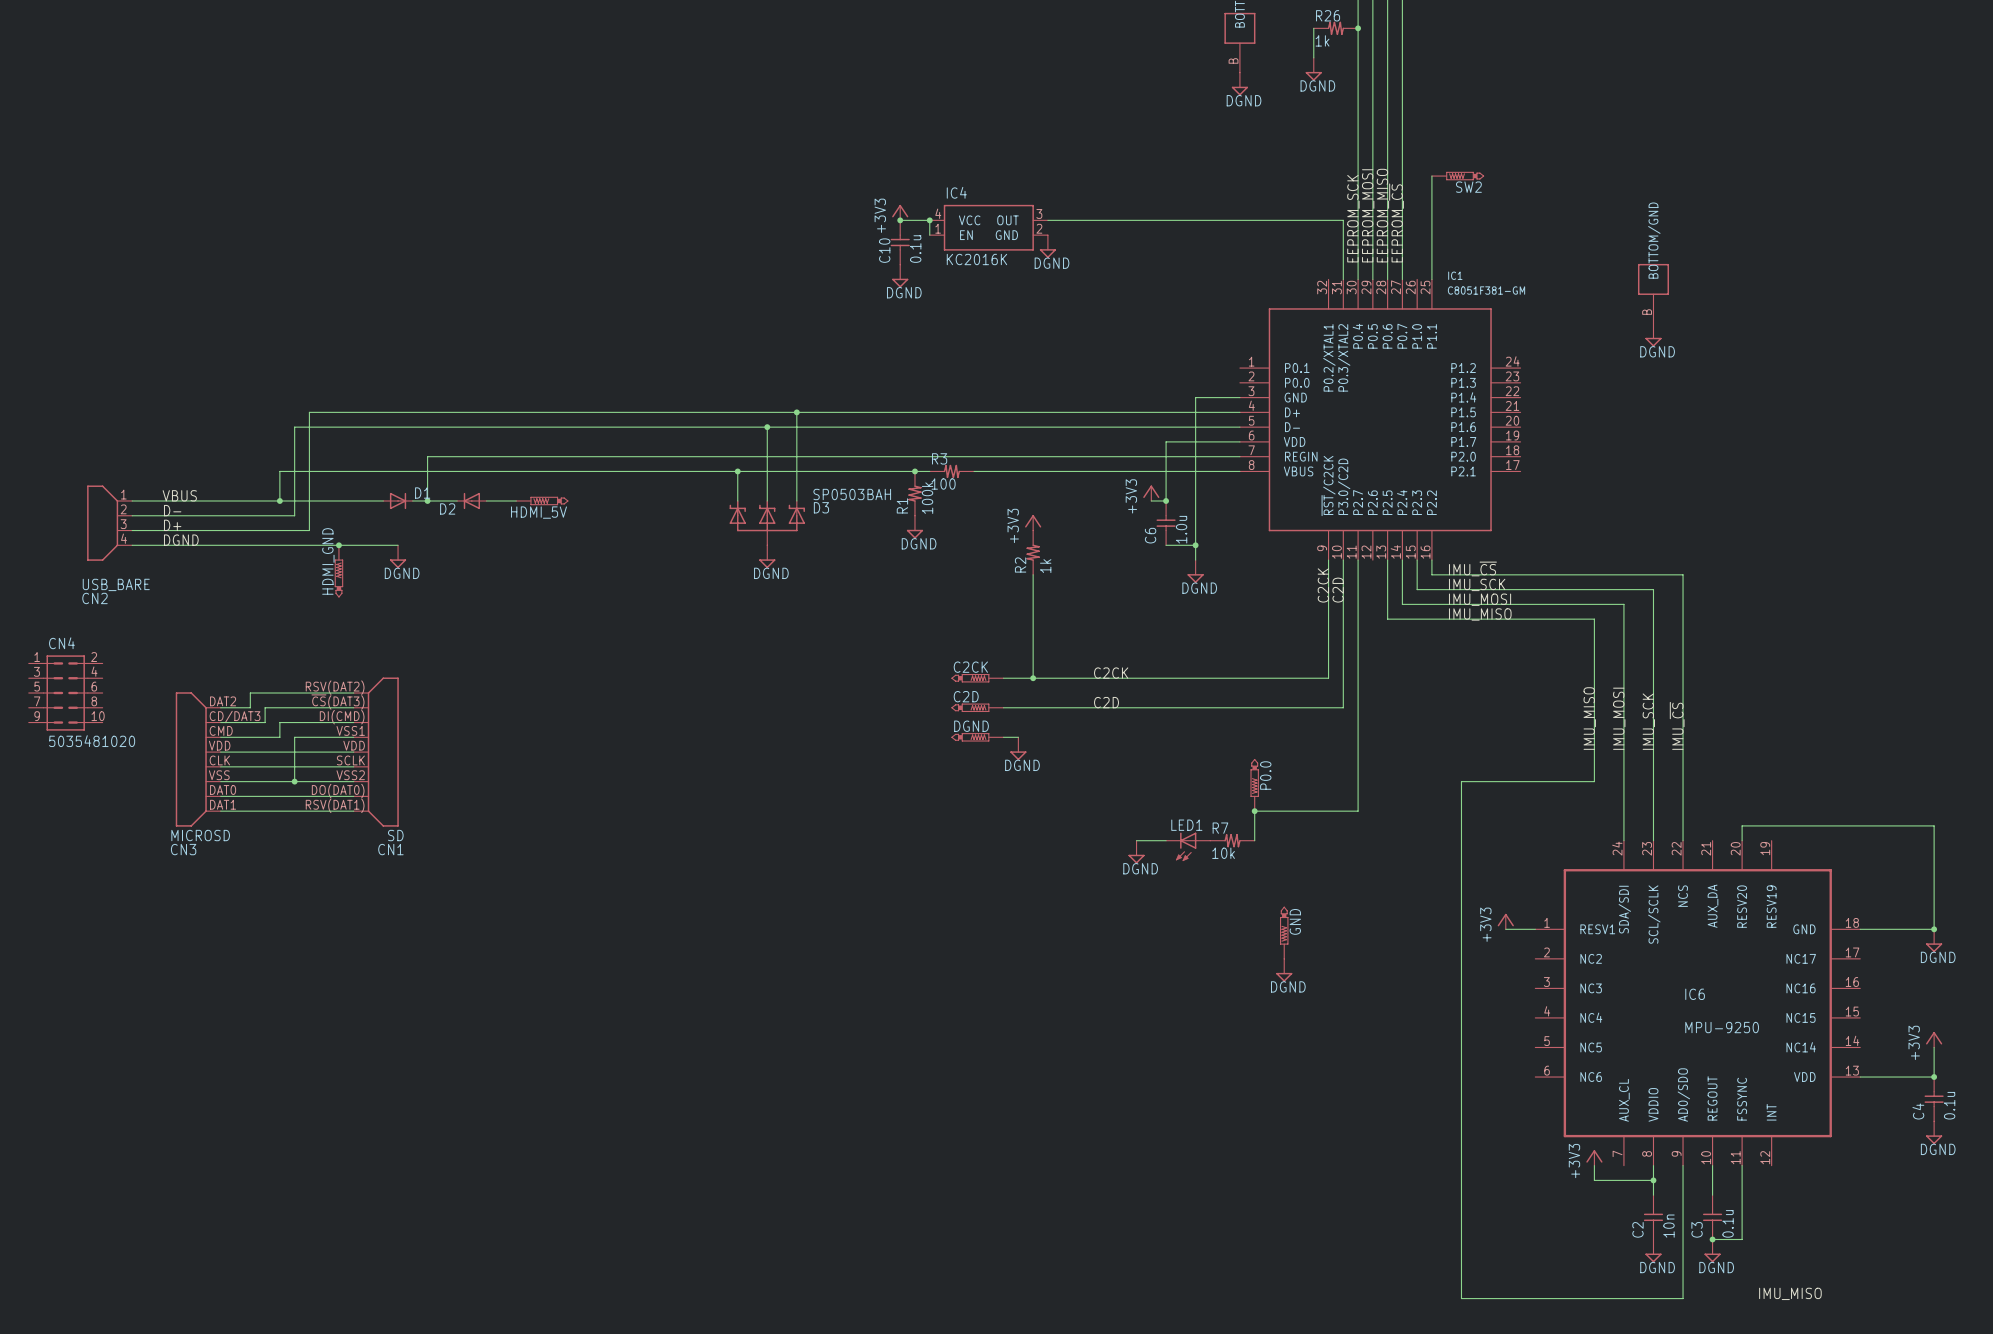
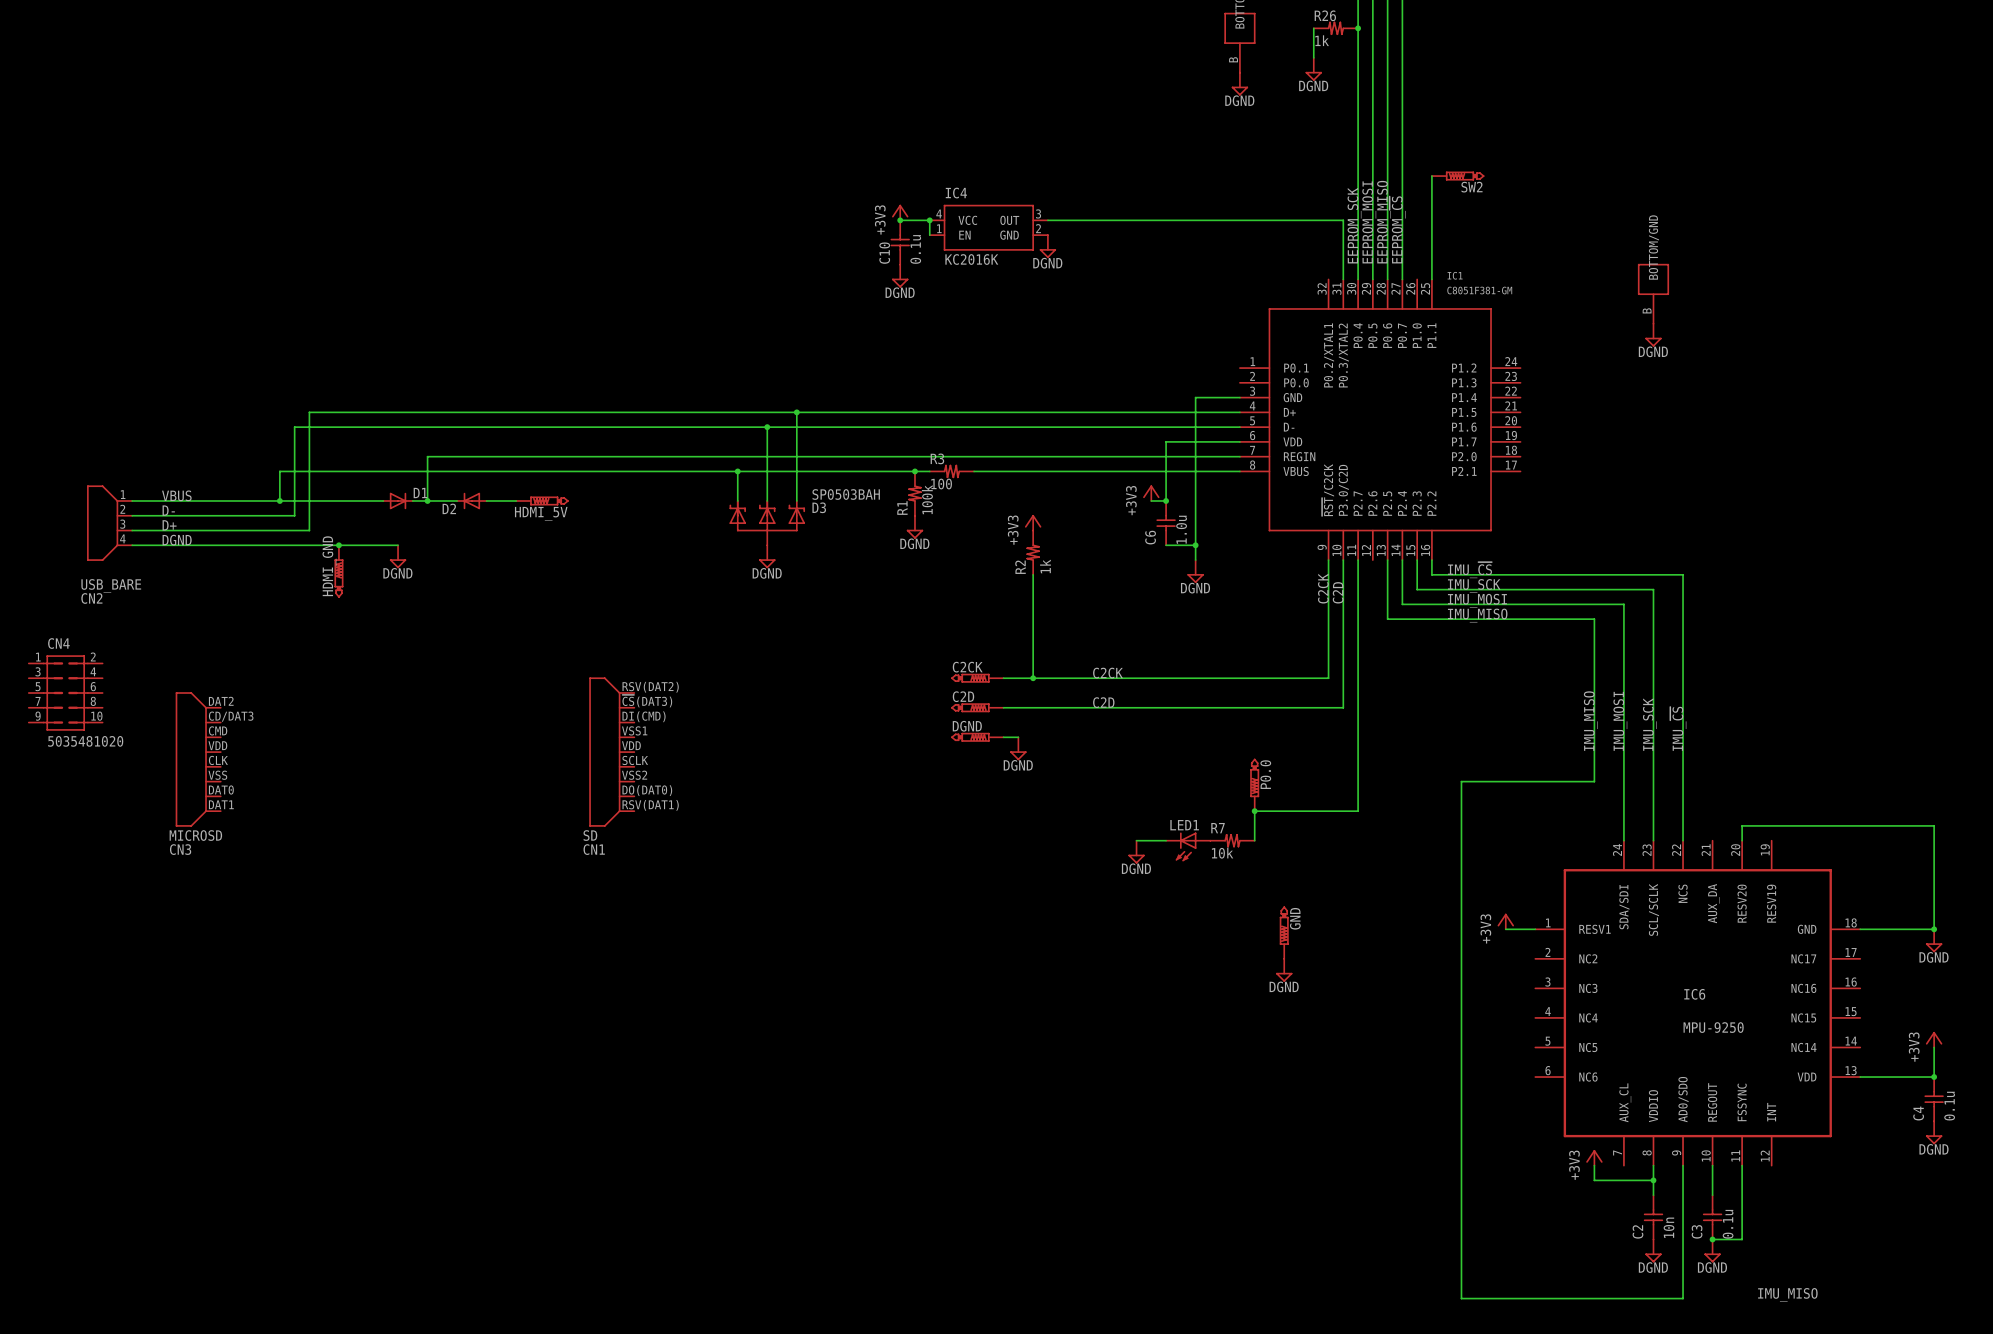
wire: (353, 693) (250, 693) (250, 707) (220, 707) -> none
wire: (353, 707) (265, 707) (265, 722) (220, 722) -> none
wire: (353, 722) (279, 722) (279, 737) (220, 737) -> none
wire: (353, 737) (294, 737) (294, 781) -> none
wire: (220, 752) (353, 752) -> none
CN1 position: (376, 752) -> (611, 752)
CN1 flip: as is (383, 752) -> left-right (604, 752)
wire: (220, 766) (353, 766) -> none
wire: (220, 781) (353, 781) -> none
junction: (294, 781) -> none
wire: (220, 796) (353, 796) -> none
wire: (220, 811) (353, 811) -> none

